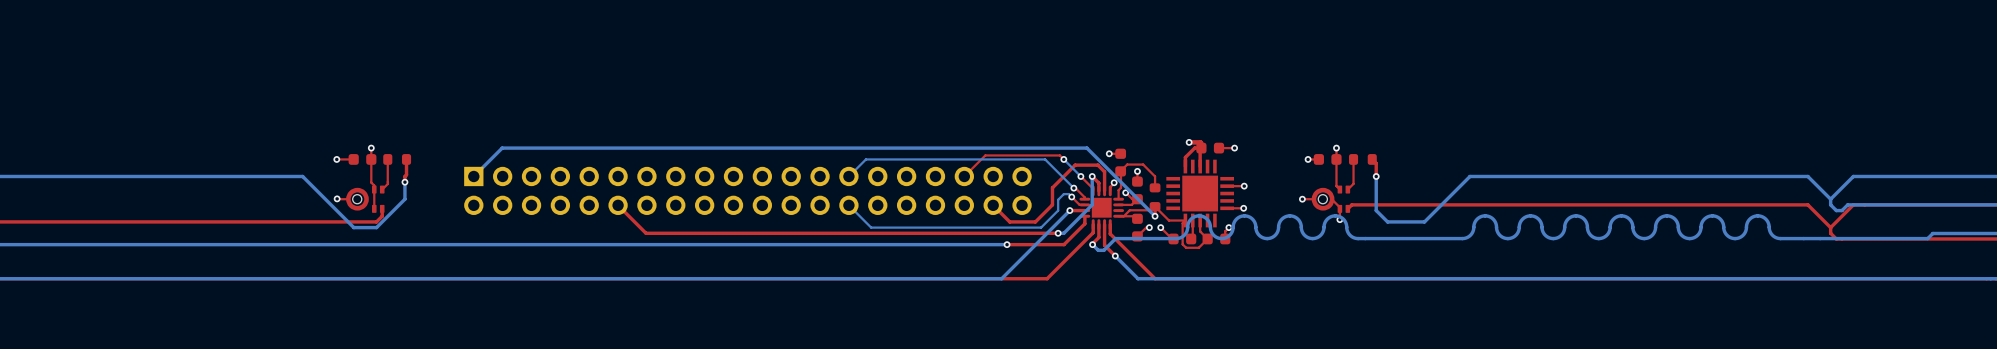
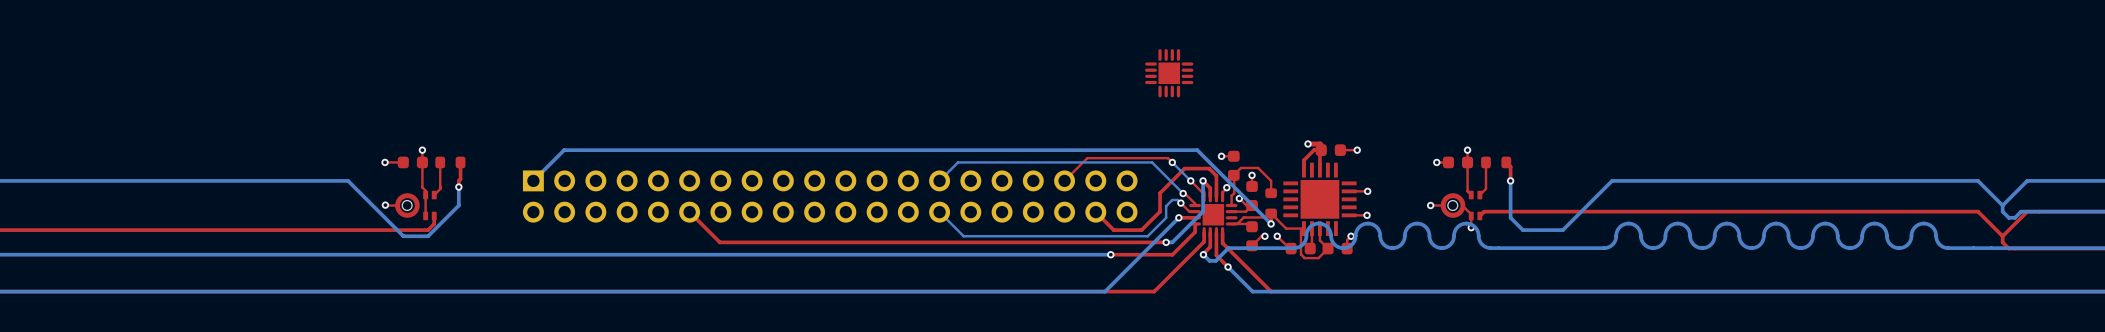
part: none -> (1169, 73)

